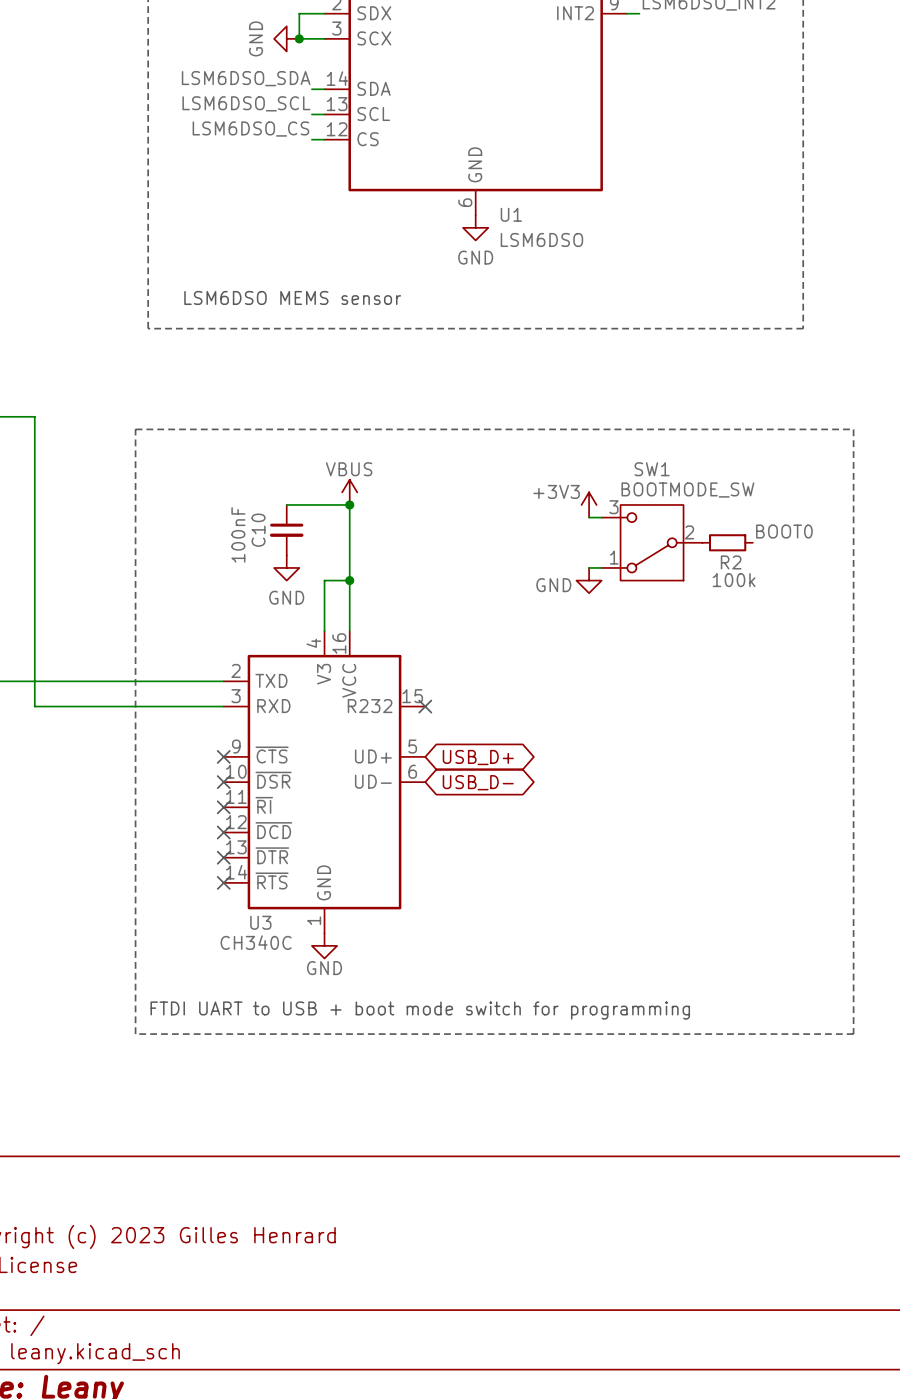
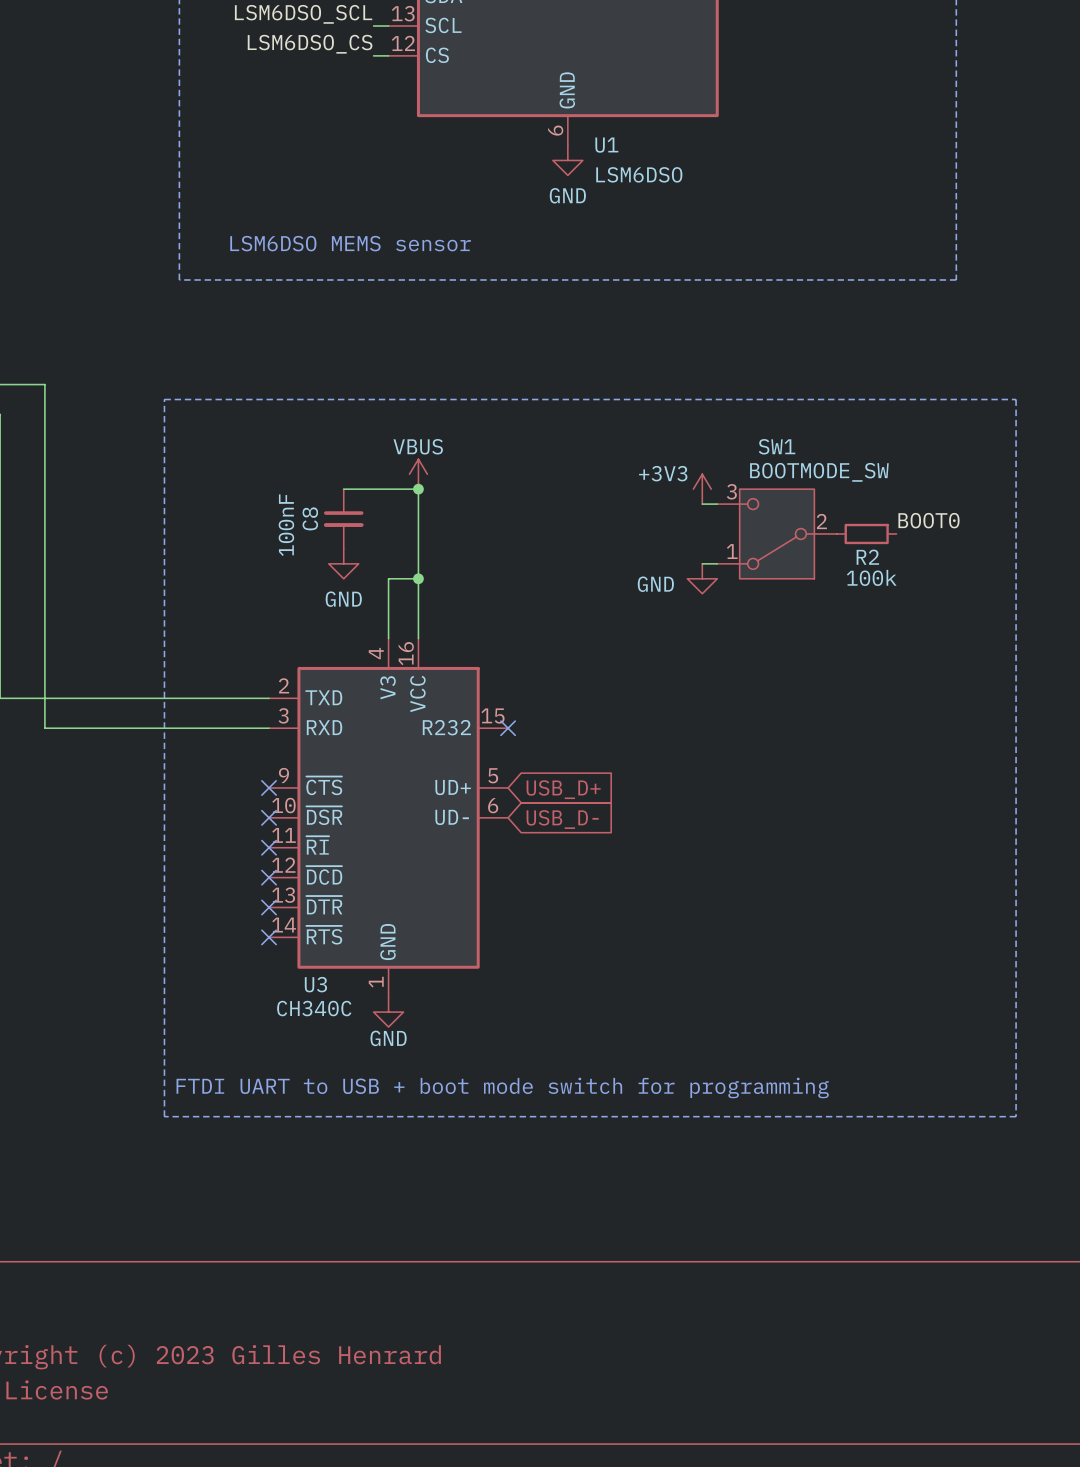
C10 name: C10 (258, 530) -> C8 (310, 518)
global label shape: bidirectional (478, 757) -> input (563, 789)
global label shape: bidirectional (478, 782) -> input (562, 819)

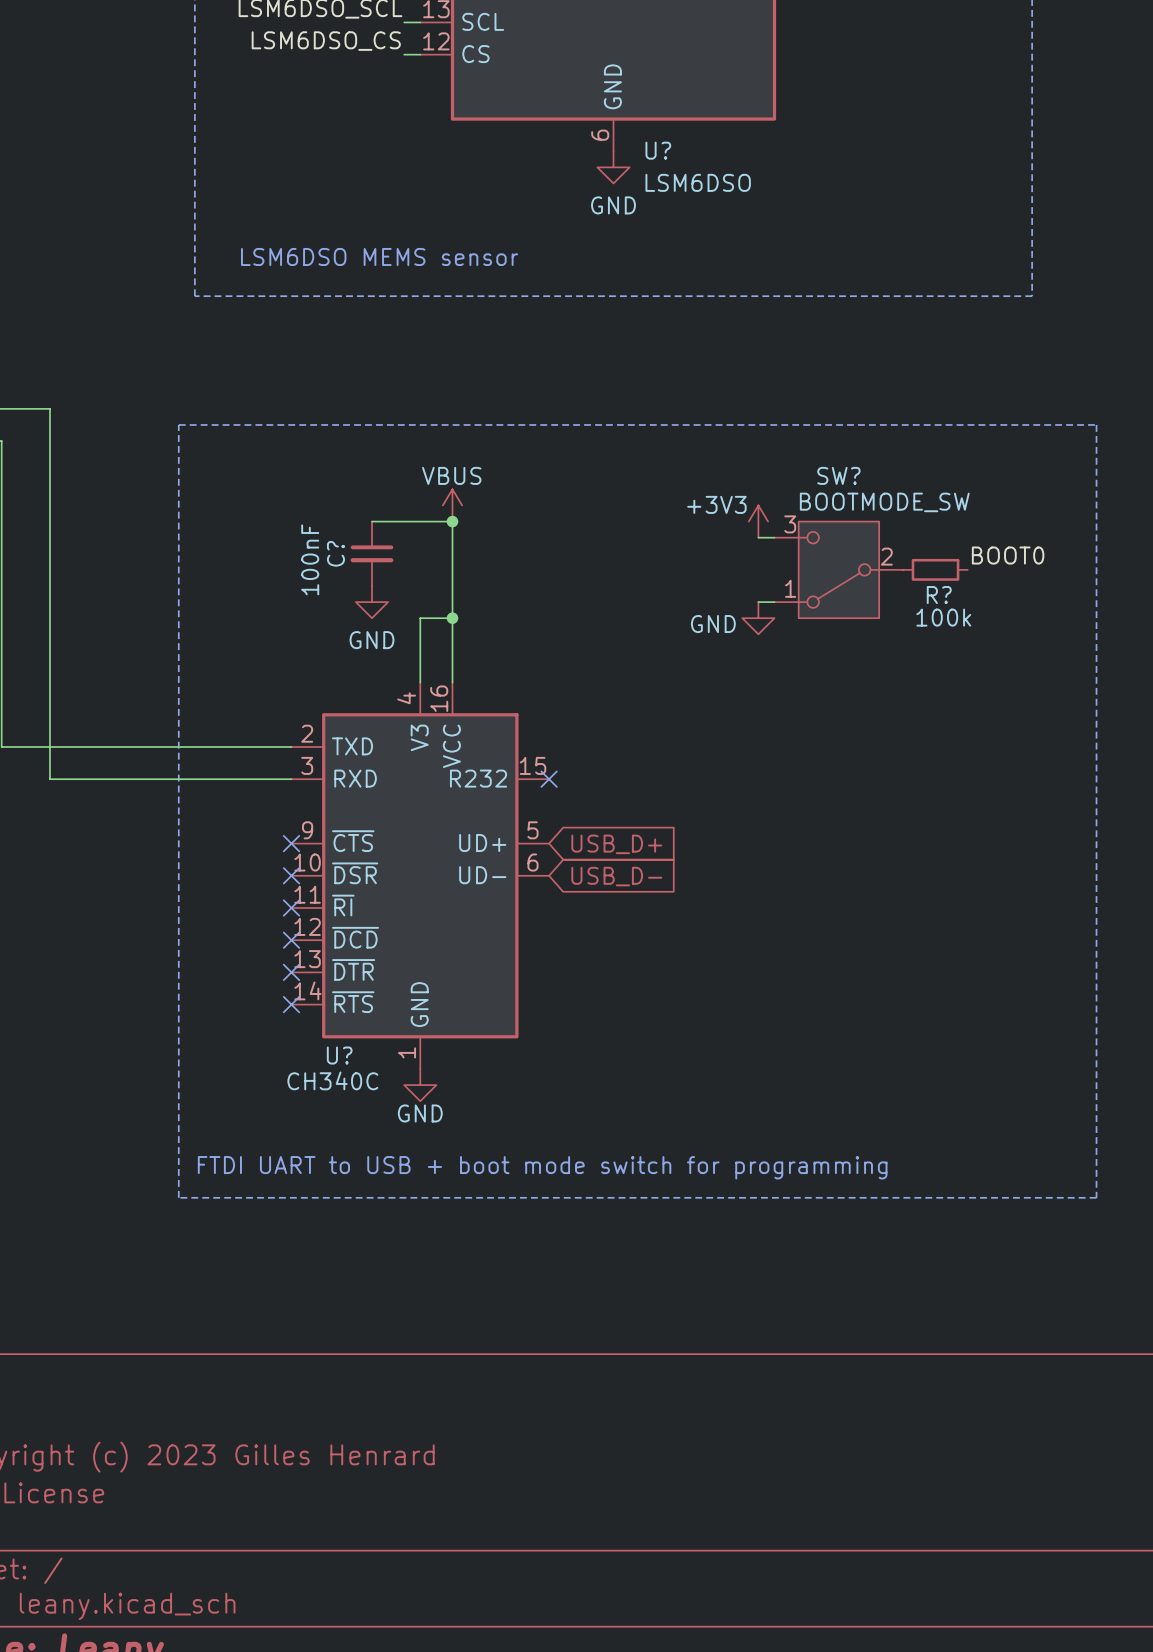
U1 name: U1 (606, 145) -> U? (658, 150)
SW1 name: SW1 (776, 446) -> SW? (838, 475)
C8 name: C8 (310, 518) -> C? (335, 553)
R2 name: R2 (867, 557) -> R? (939, 595)
U3 name: U3 (315, 984) -> U? (339, 1055)

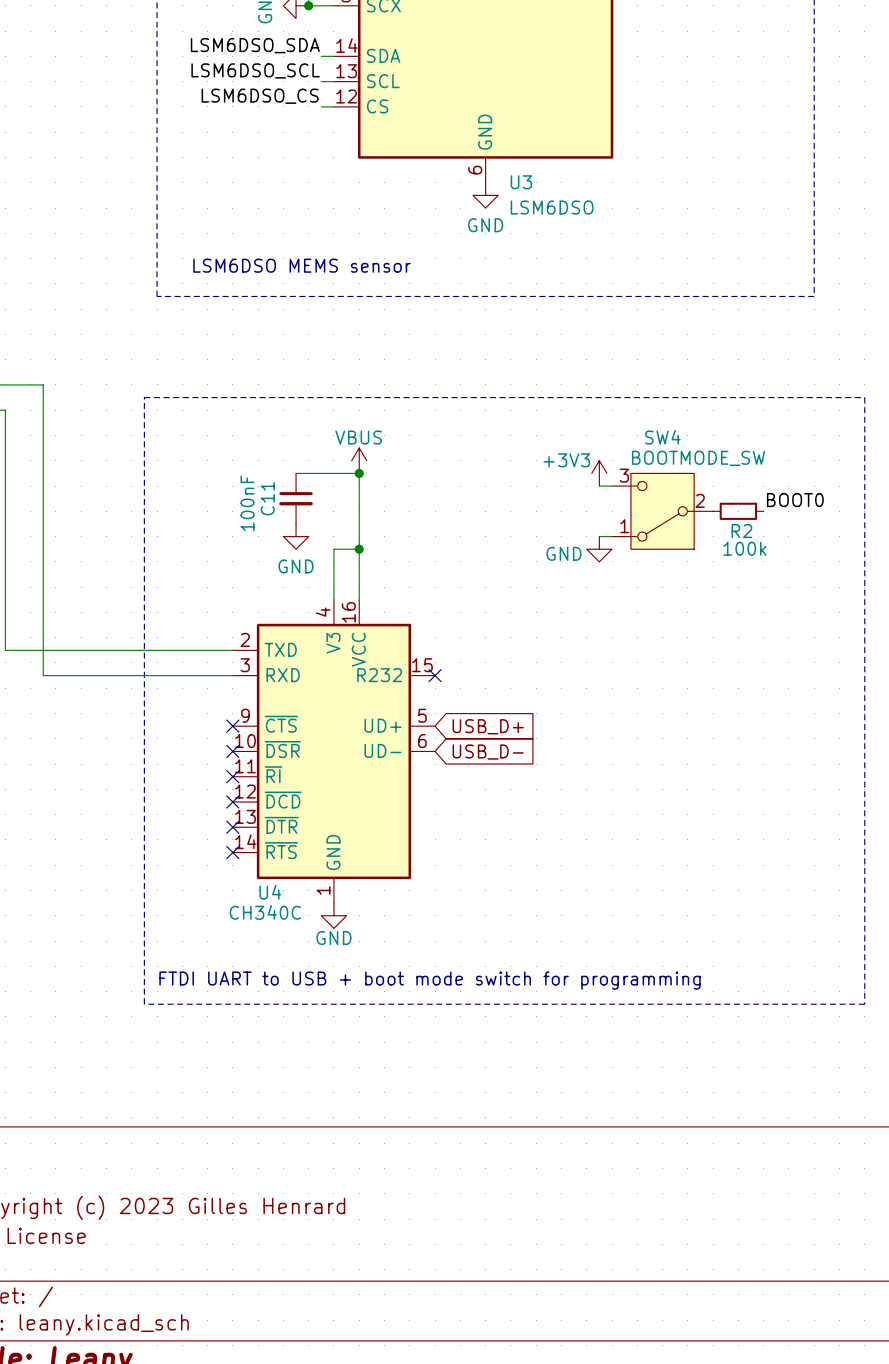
U? name: U? (658, 150) -> U3 (521, 182)
SW? name: SW? (838, 475) -> SW4 (662, 437)
C? name: C? (335, 553) -> C11 (267, 498)
R? name: R? (939, 595) -> R2 (741, 531)
U? name: U? (339, 1055) -> U4 (270, 892)

